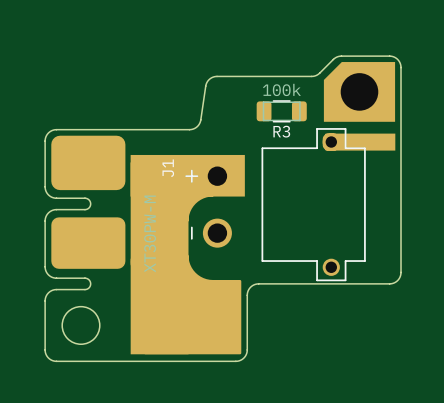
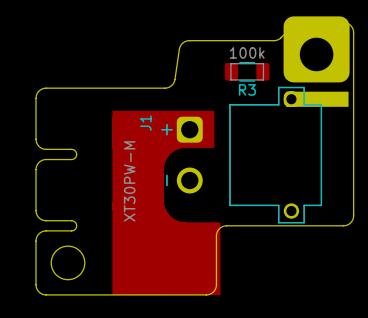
part footprint: [323, 62, 396, 122] -> [283, 16, 350, 83]
part footprint: [130, 154, 245, 355] -> [112, 110, 221, 296]
part: (88, 202) -> none

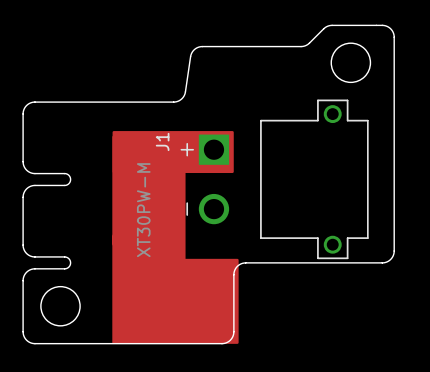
round board edge: none -> [330, 42, 372, 83]
part: (316, 49) -> none
R3: 100k (247, 71) -> none
J1 footprint: [161, 86, 349, 224] -> [180, 99, 369, 260]
part footprint: [112, 110, 221, 296] -> [112, 131, 239, 344]

